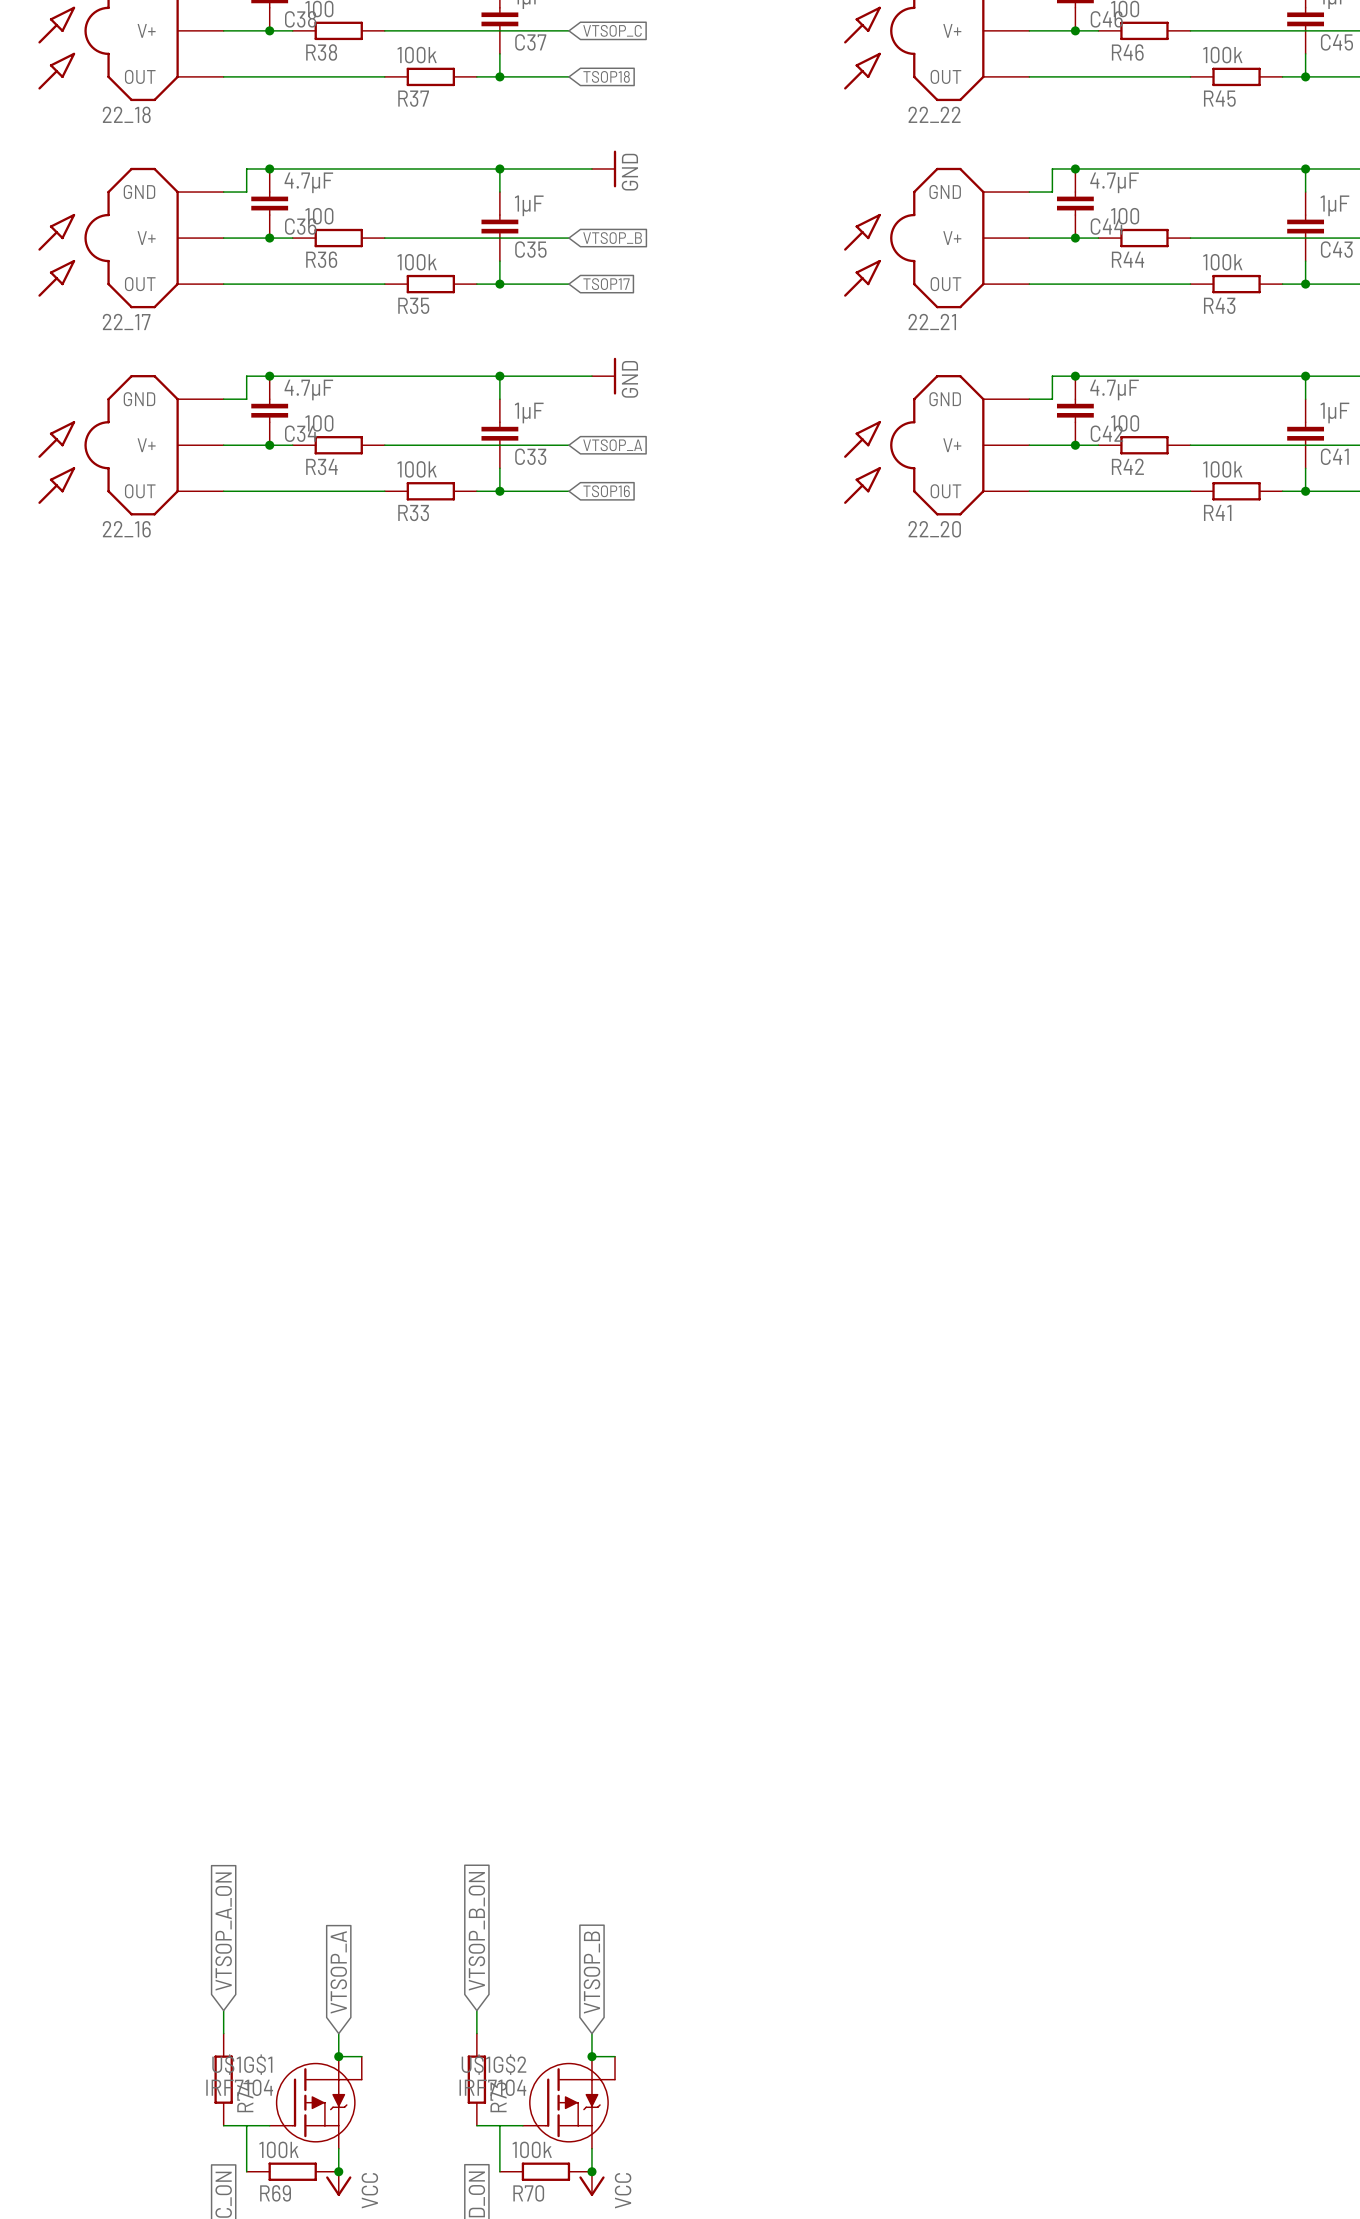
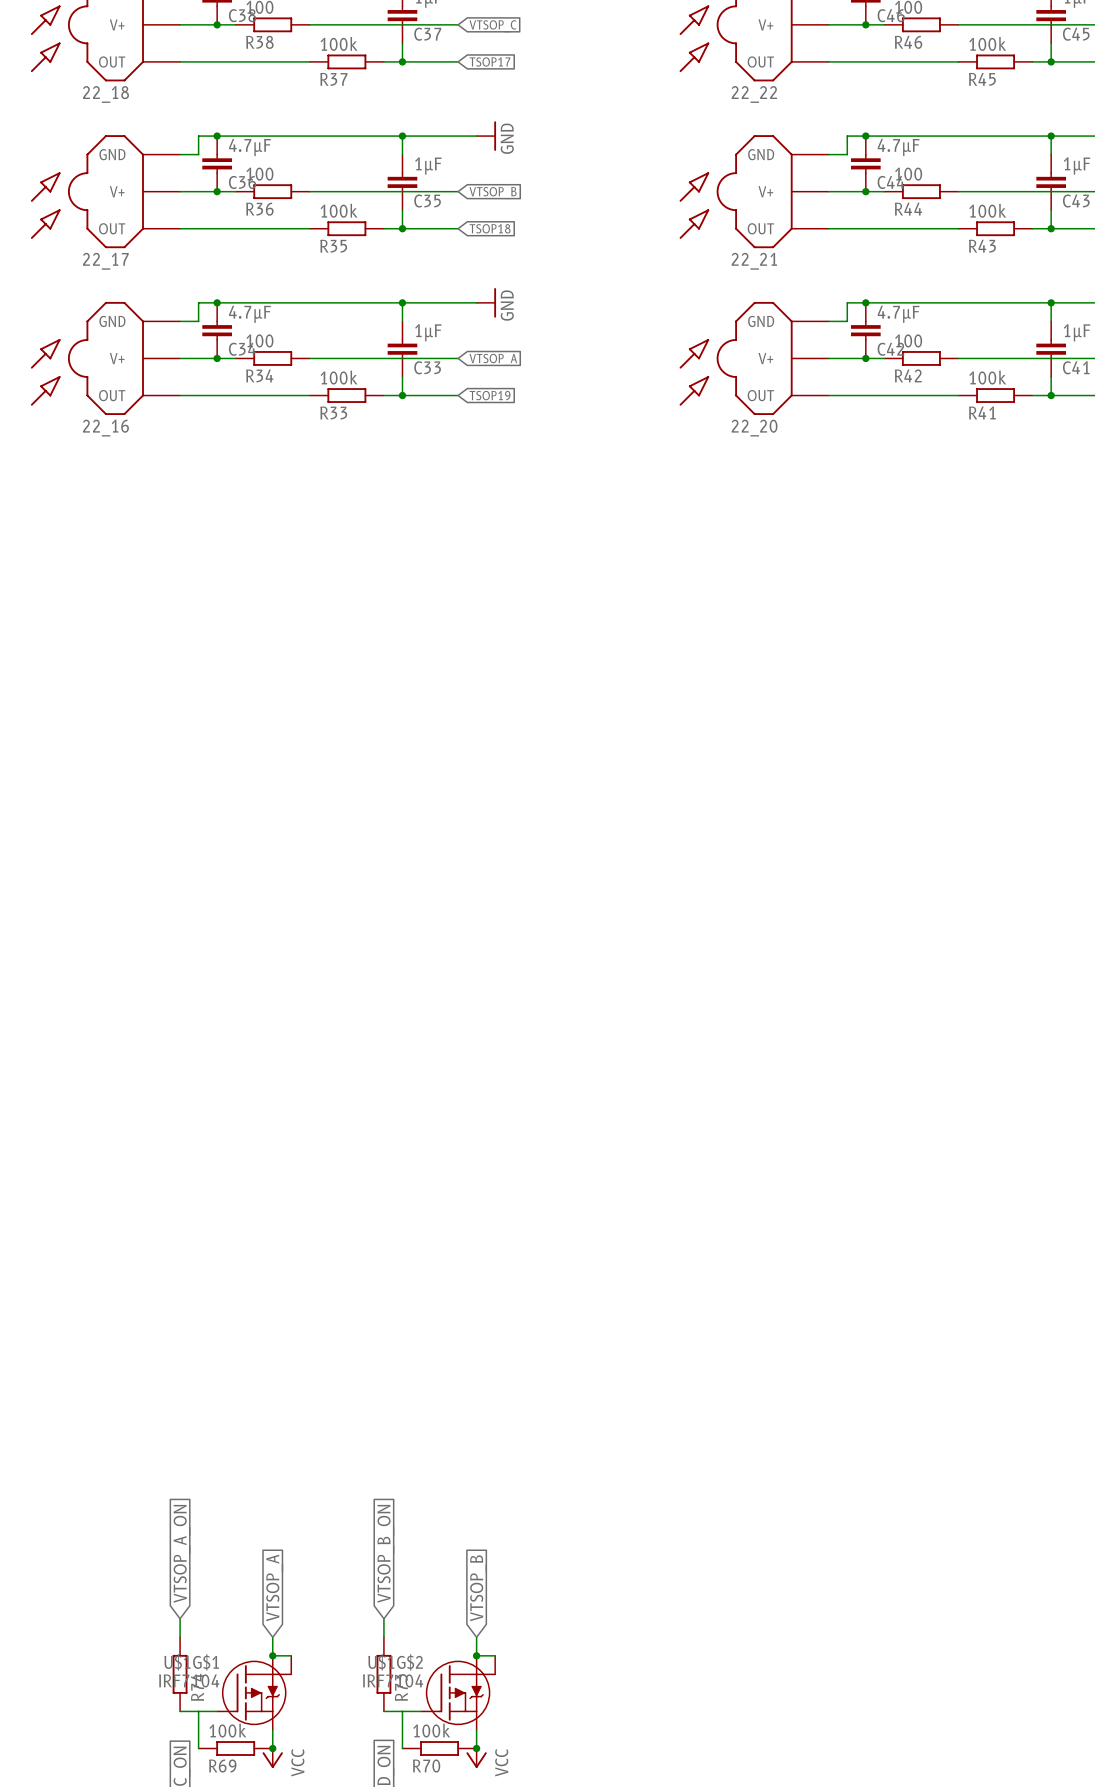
global label: TSOP18 (606, 76) -> TSOP17 (489, 61)
global label: TSOP17 (606, 284) -> TSOP18 (490, 228)
global label: TSOP16 (606, 491) -> TSOP19 (490, 395)

